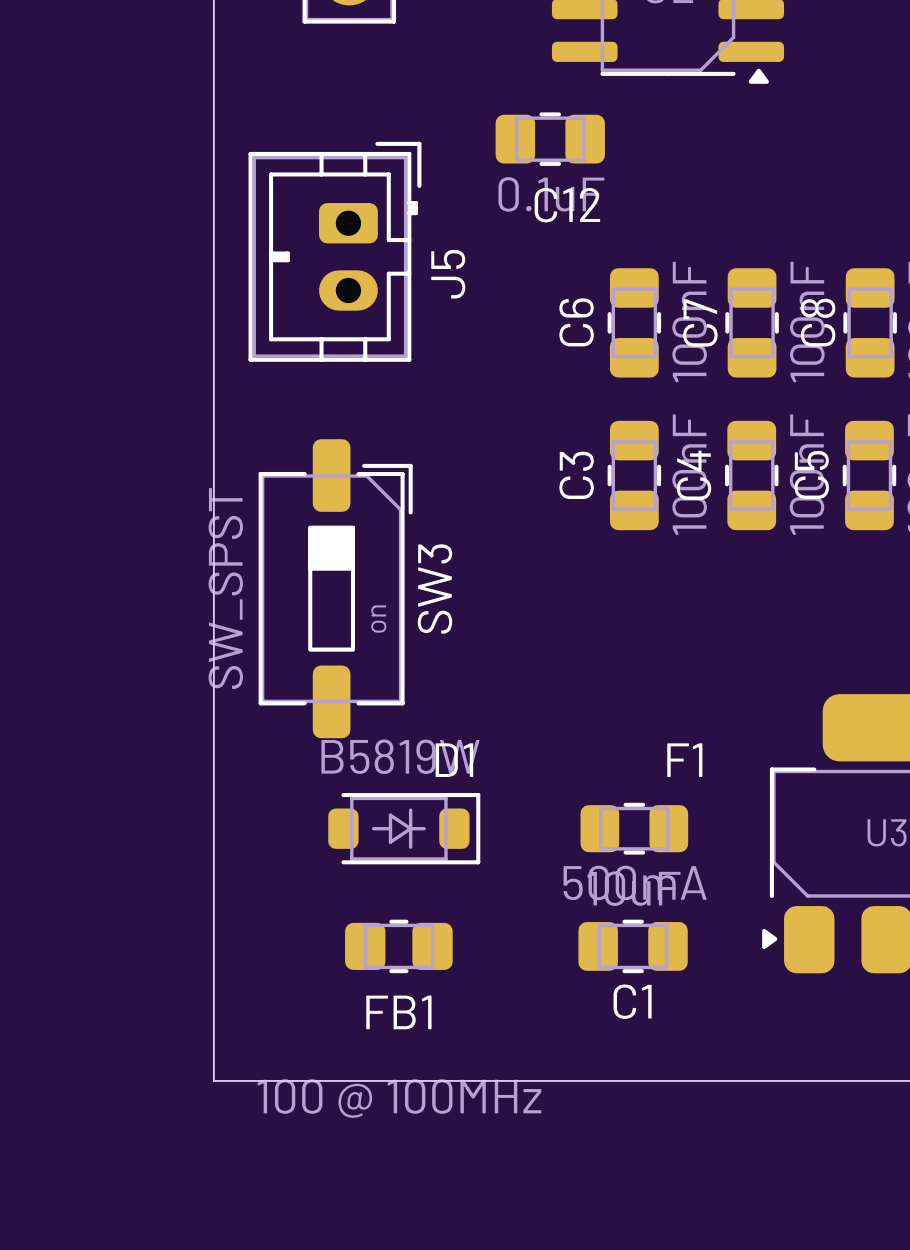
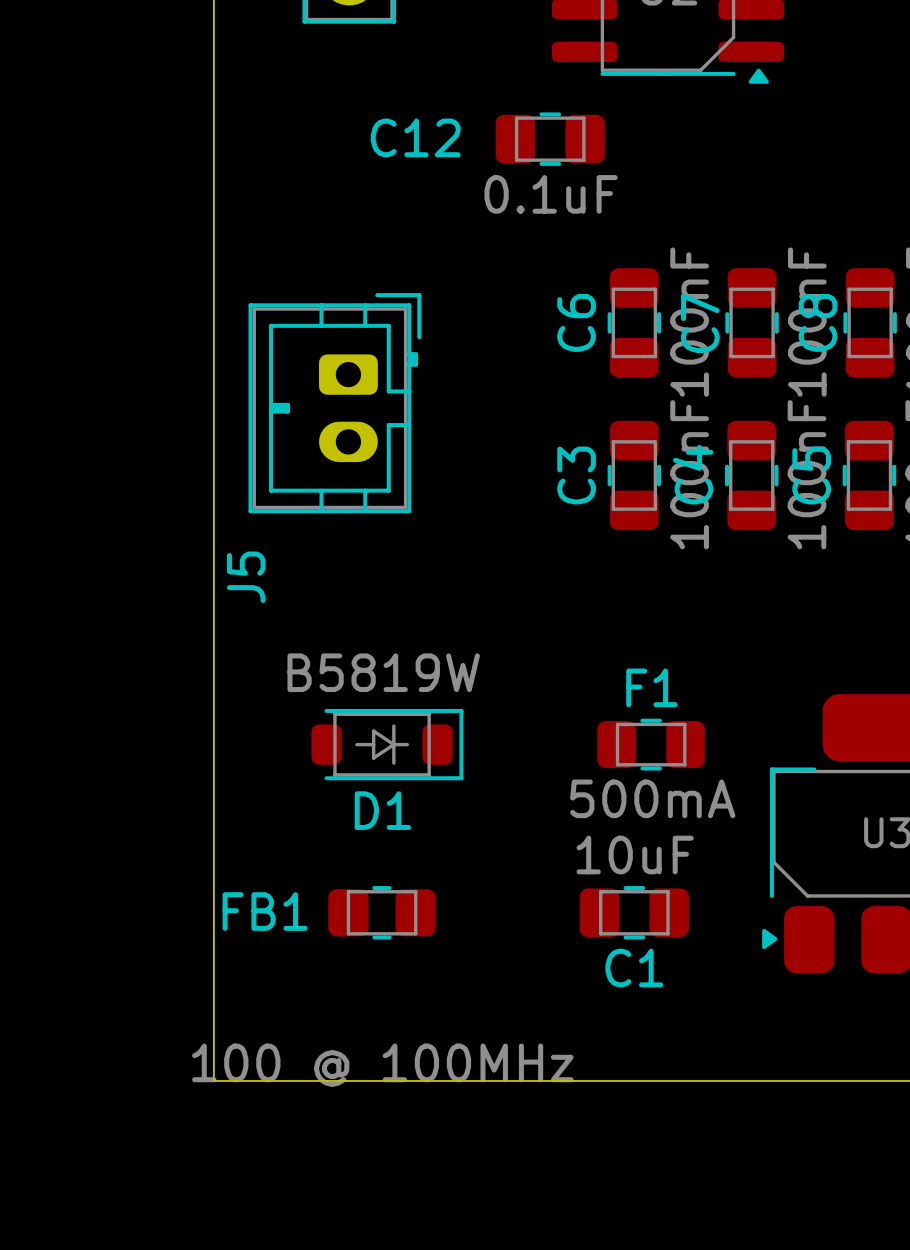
C12 name position: C12 (567, 205) -> C12 (415, 137)
J5 position: (334, 251) -> (334, 403)
J5 name position: J5 (448, 274) -> J5 (246, 577)
SW3: SW_SPST (335, 588) -> none
D1 name position: D1 (454, 760) -> D1 (382, 810)
F1 name position: F1 (684, 760) -> F1 (651, 687)
D1 position: (404, 828) -> (387, 744)
F1 position: (634, 828) -> (651, 744)
FB1 position: (398, 946) -> (382, 912)
C1 position: (633, 946) -> (634, 912)
FB1 name position: FB1 (398, 1012) -> FB1 (265, 911)

